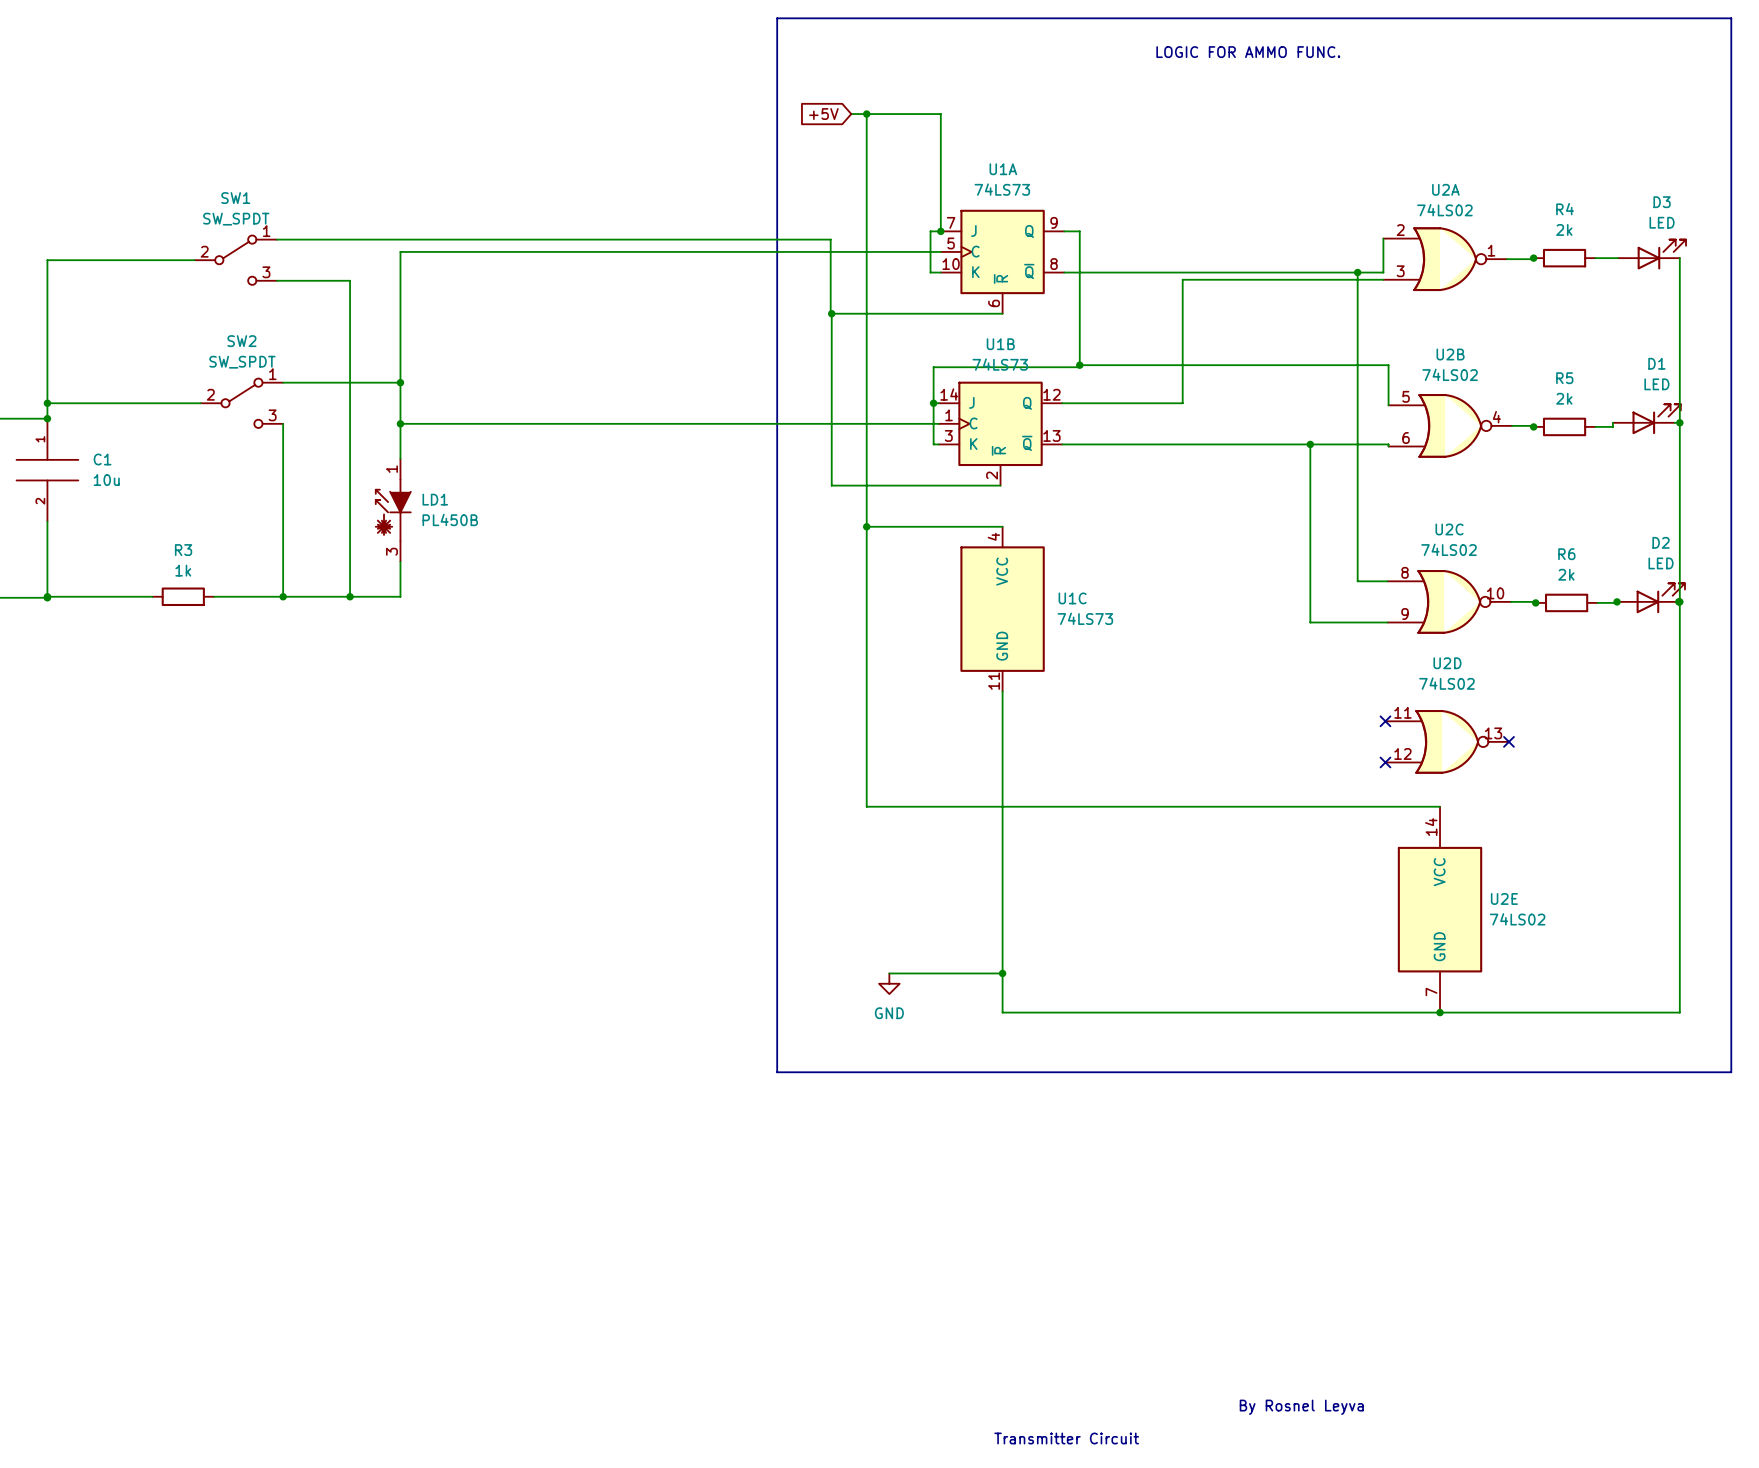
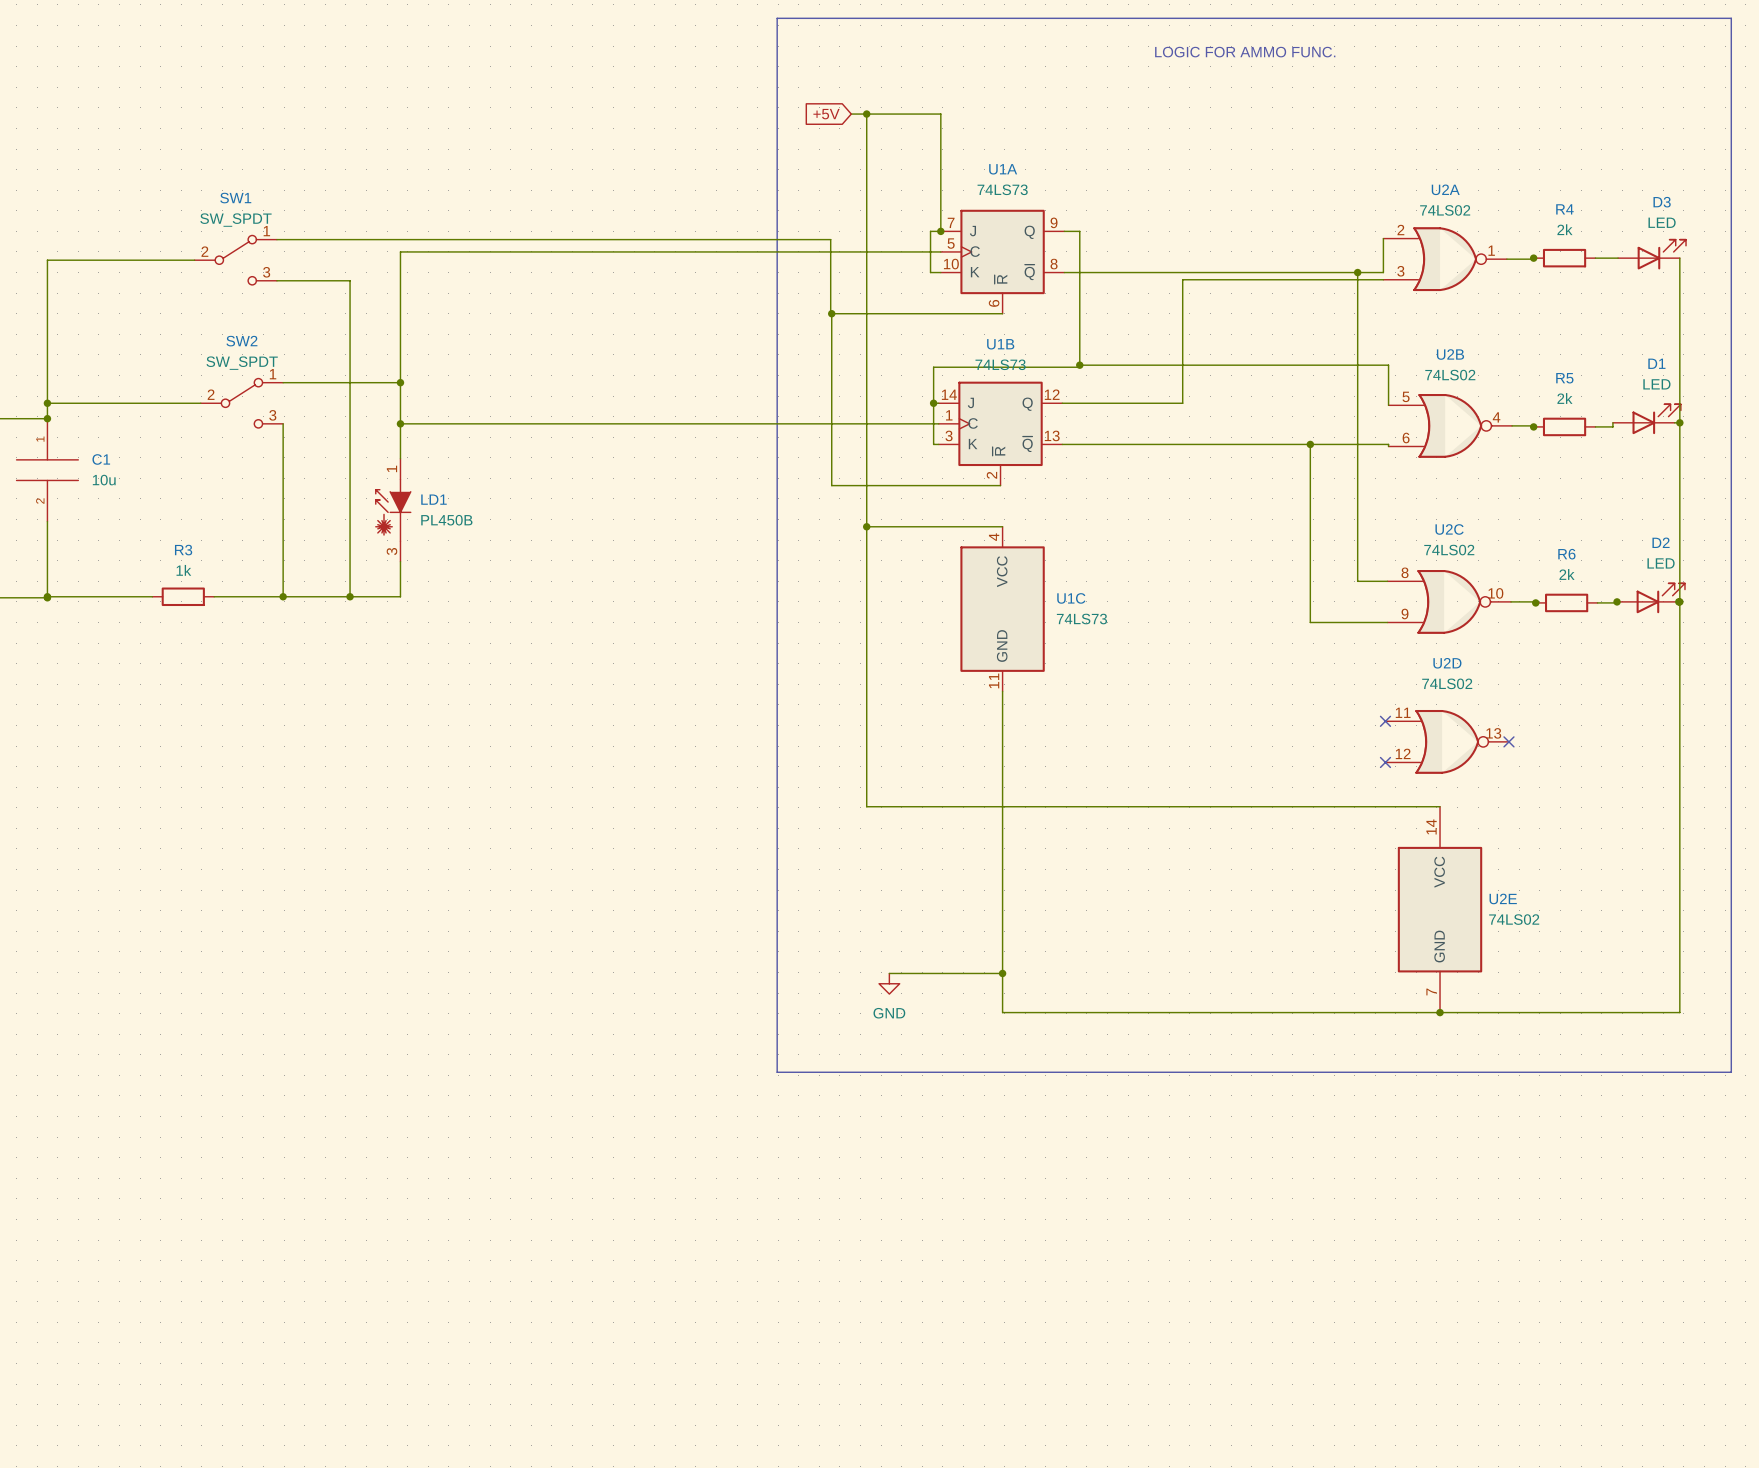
text: By Rosnel Leyva (1301, 1407) -> none
text: Transmitter Circuit (1066, 1438) -> none

